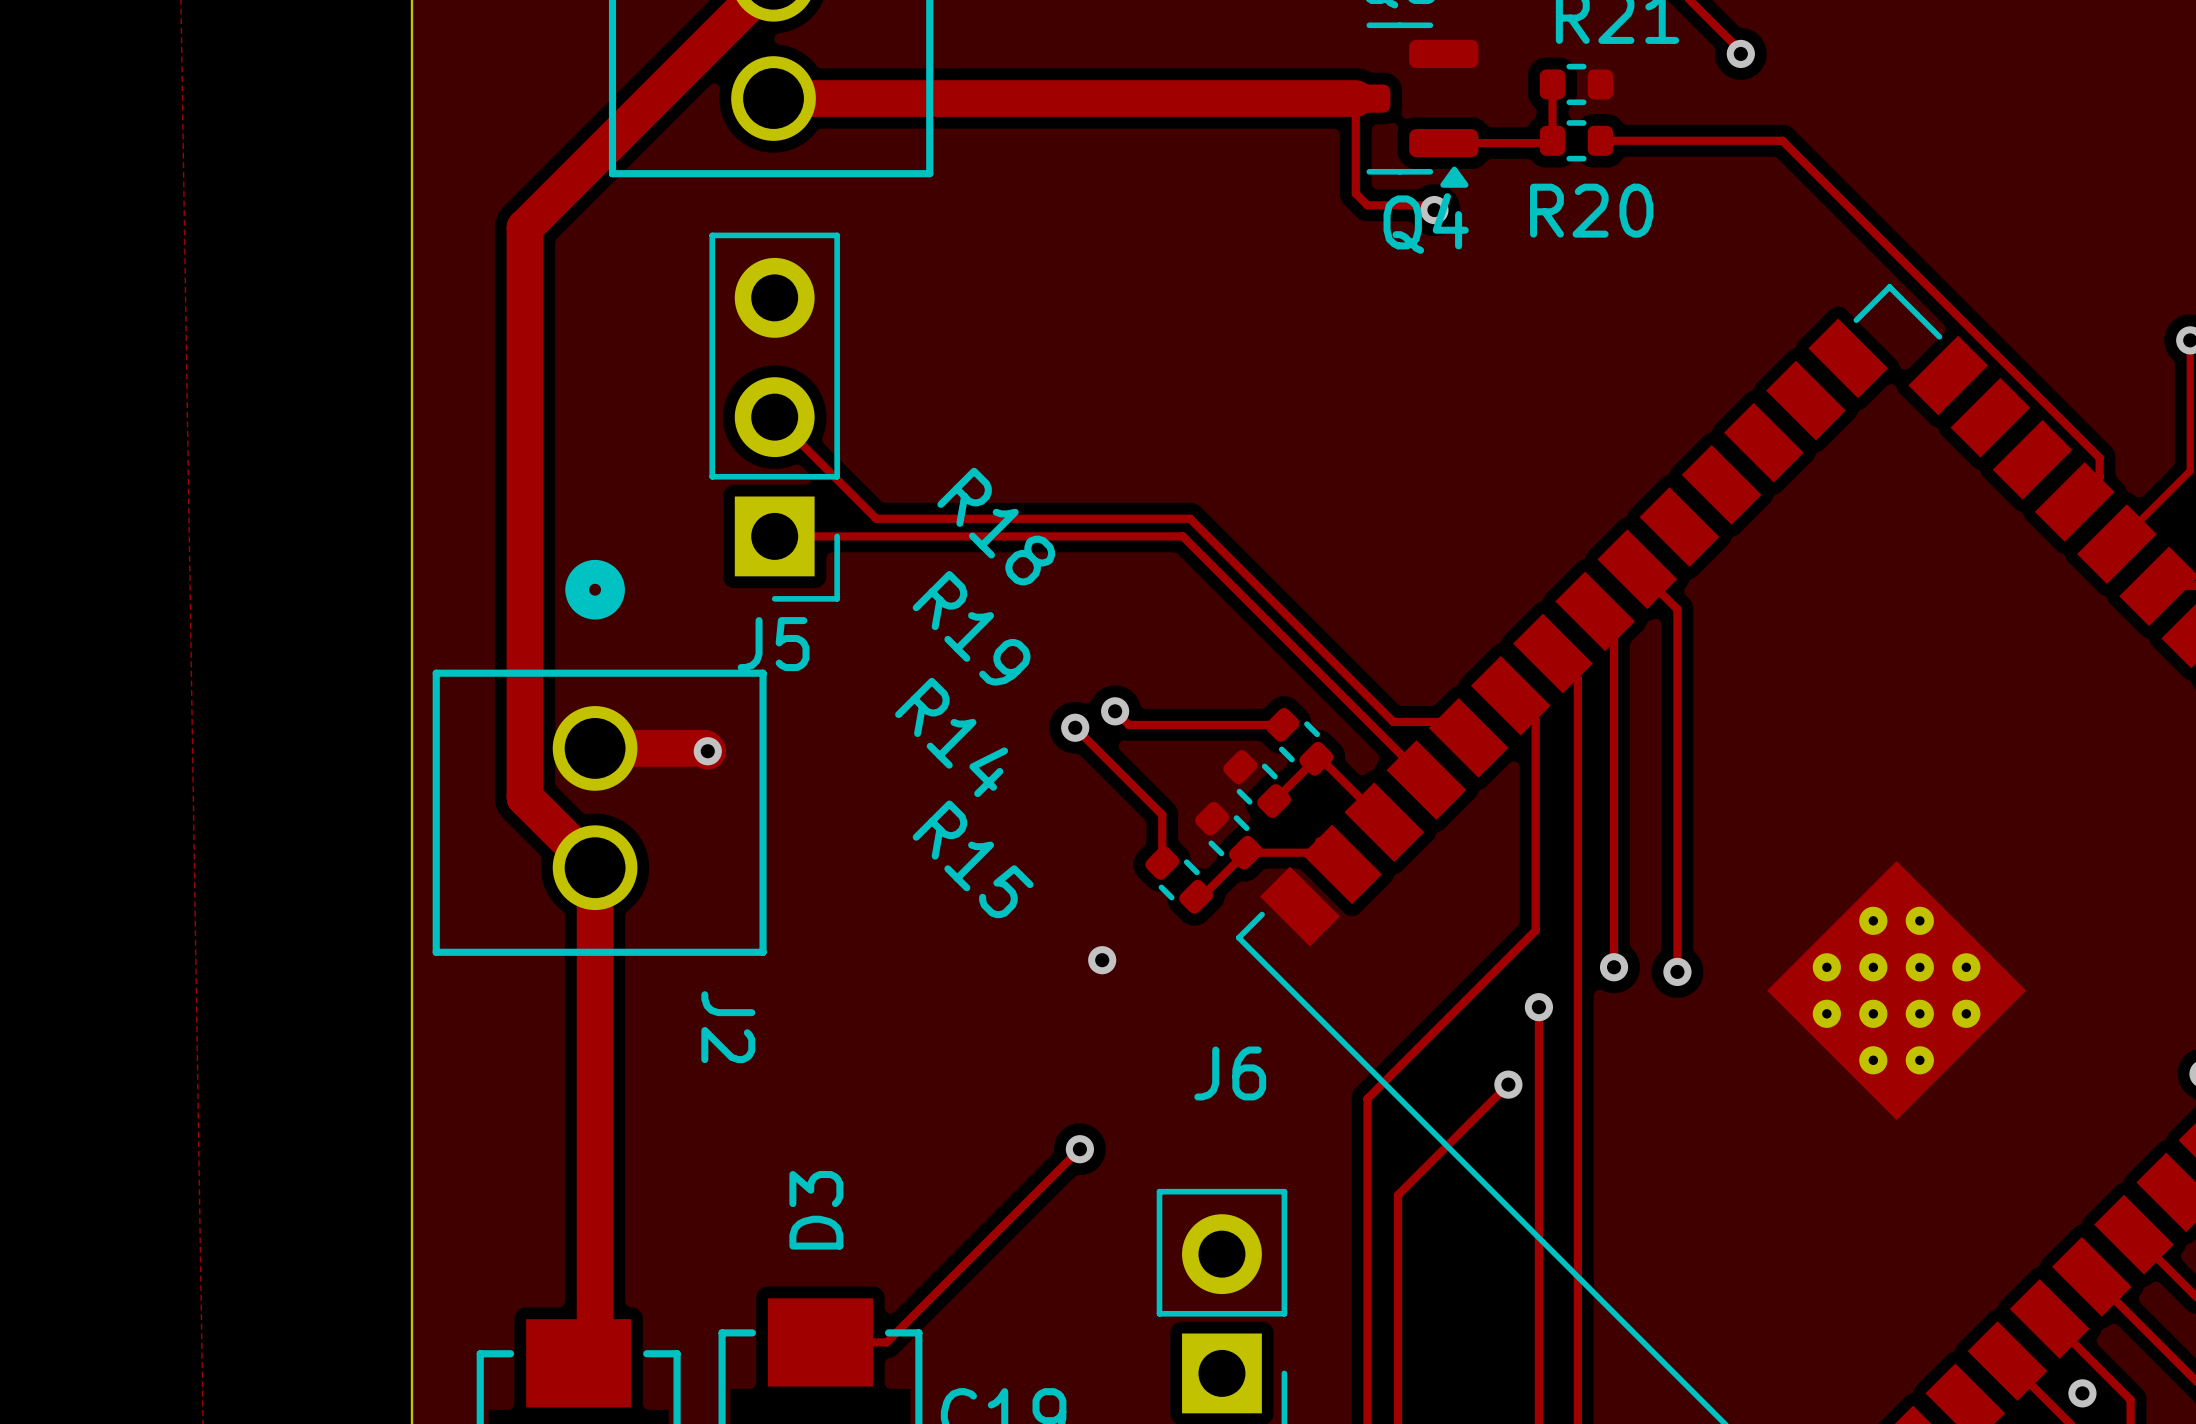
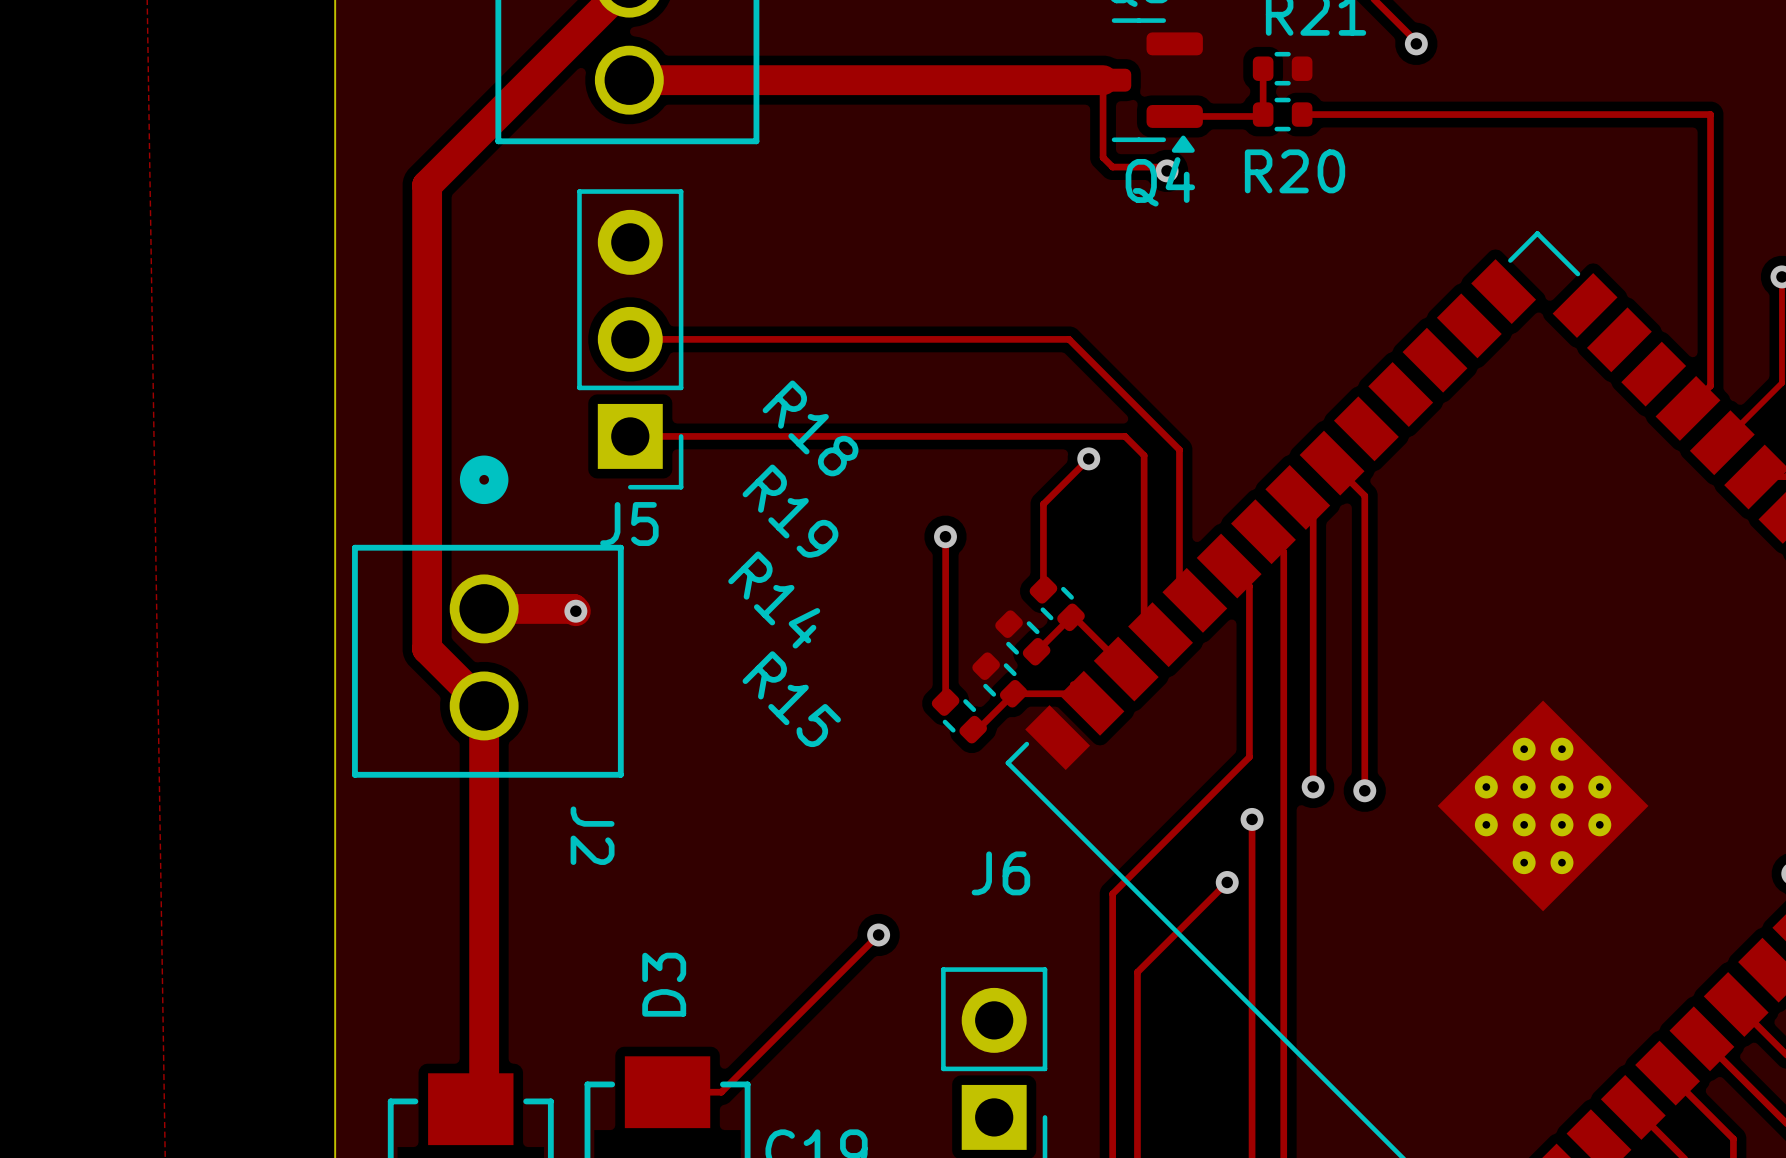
track: (1782, 140) (2099, 457) (2099, 477) -> (1450, 114) (1710, 114) (1710, 385) (1708, 387)
track: (774, 417) (876, 518) (1190, 518) (1393, 721) (1452, 721) -> (630, 339) (1069, 339) (1179, 449) (1179, 584) (1181, 587)
track: (1182, 536) (1406, 759) -> (962, 436) (1125, 436) (1144, 455) (1144, 618)
via: none -> (1088, 458)
via: none -> (945, 536)
track: (1115, 711) (1128, 724) (1282, 724) -> (1088, 458) (1043, 504) (1043, 589)
via: (1115, 711) -> none
track: (1075, 727) (1162, 814) -> (945, 536) (945, 662)
via: (1075, 727) -> none
via: (1102, 960) -> none
via: (2082, 1393) -> none

